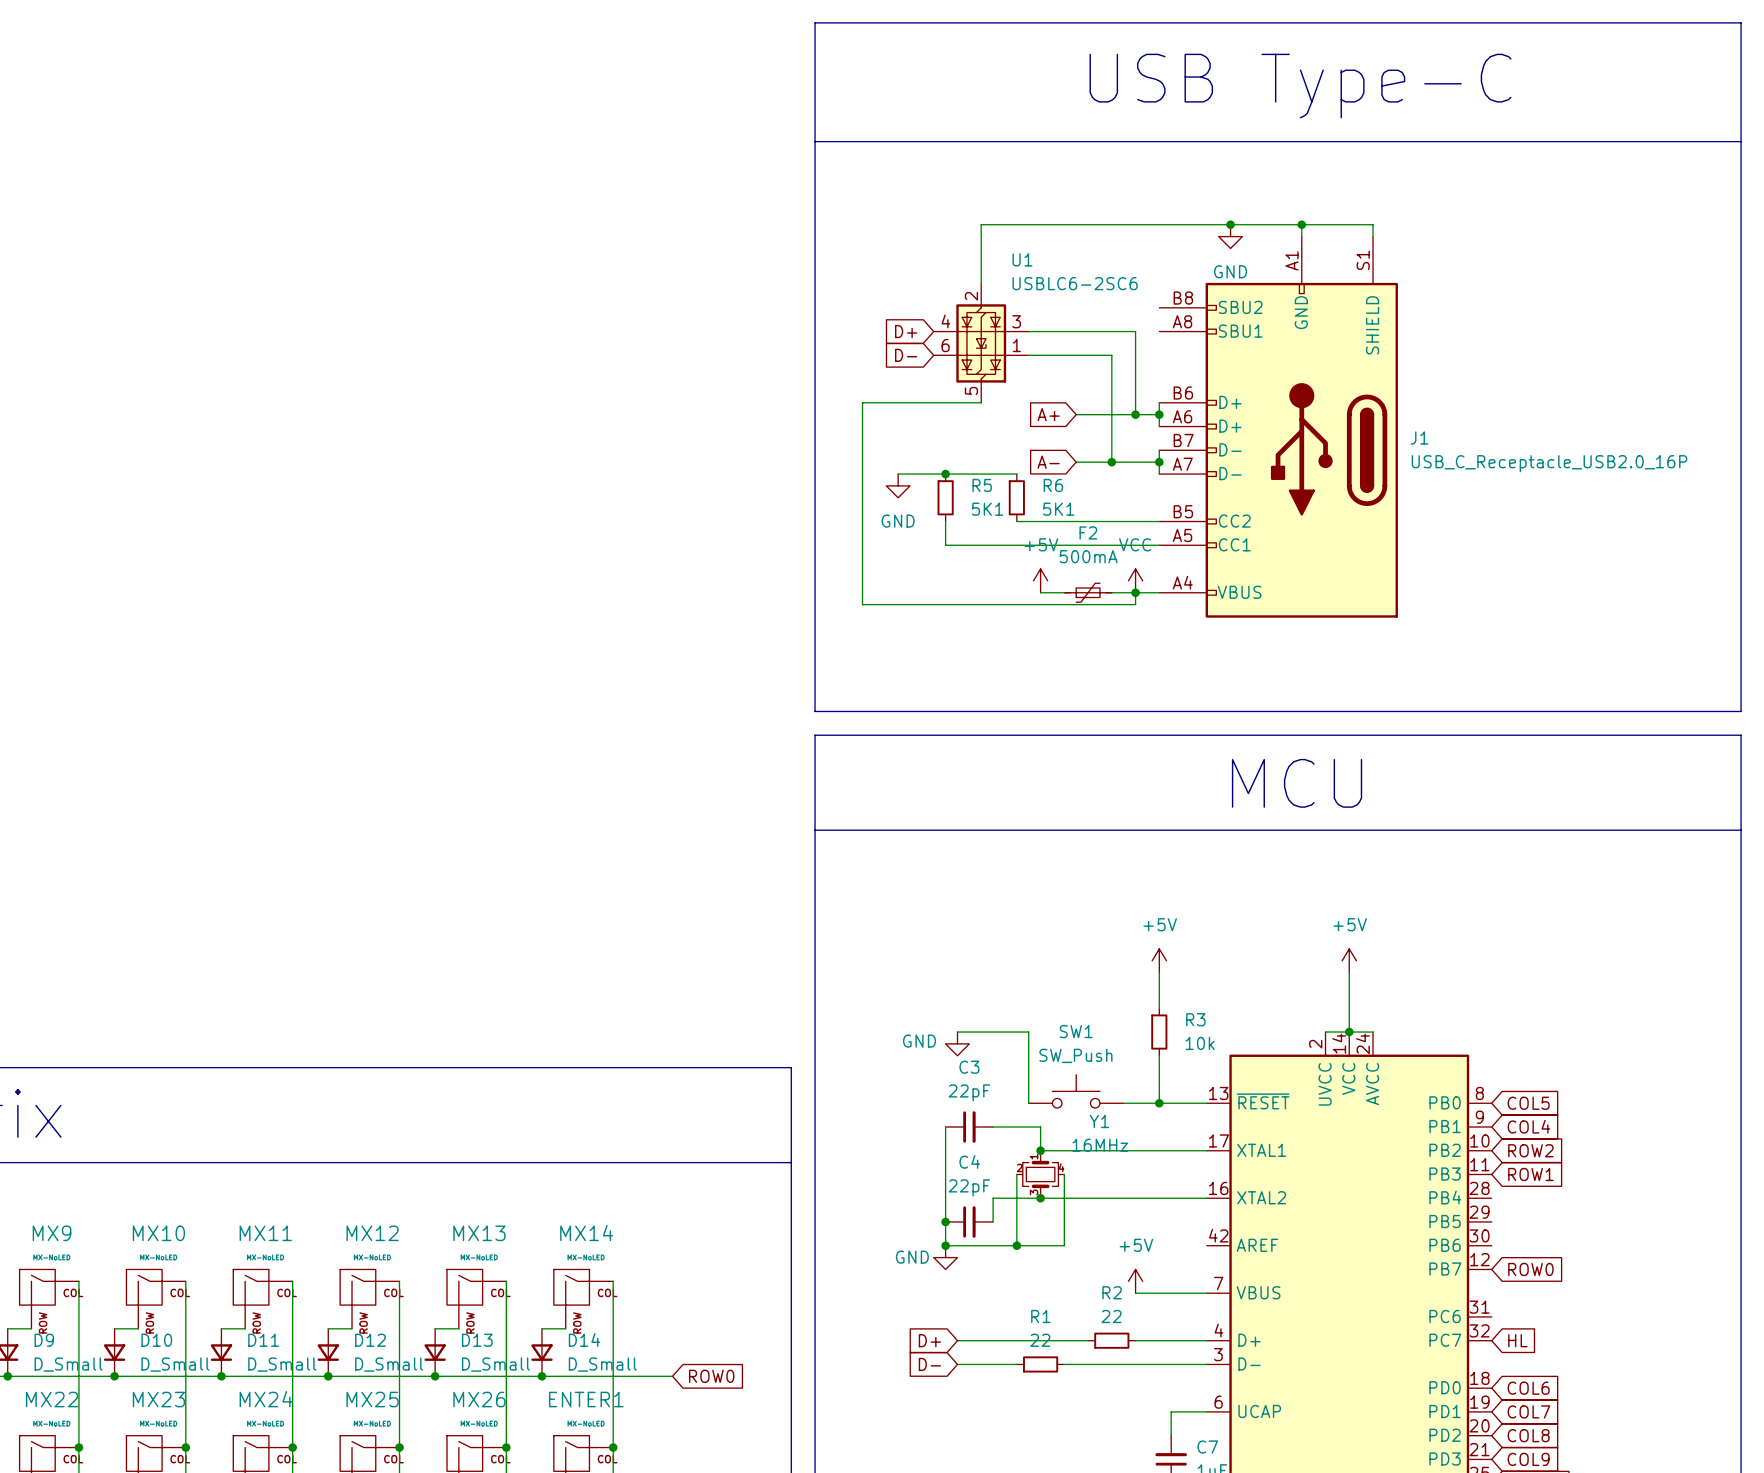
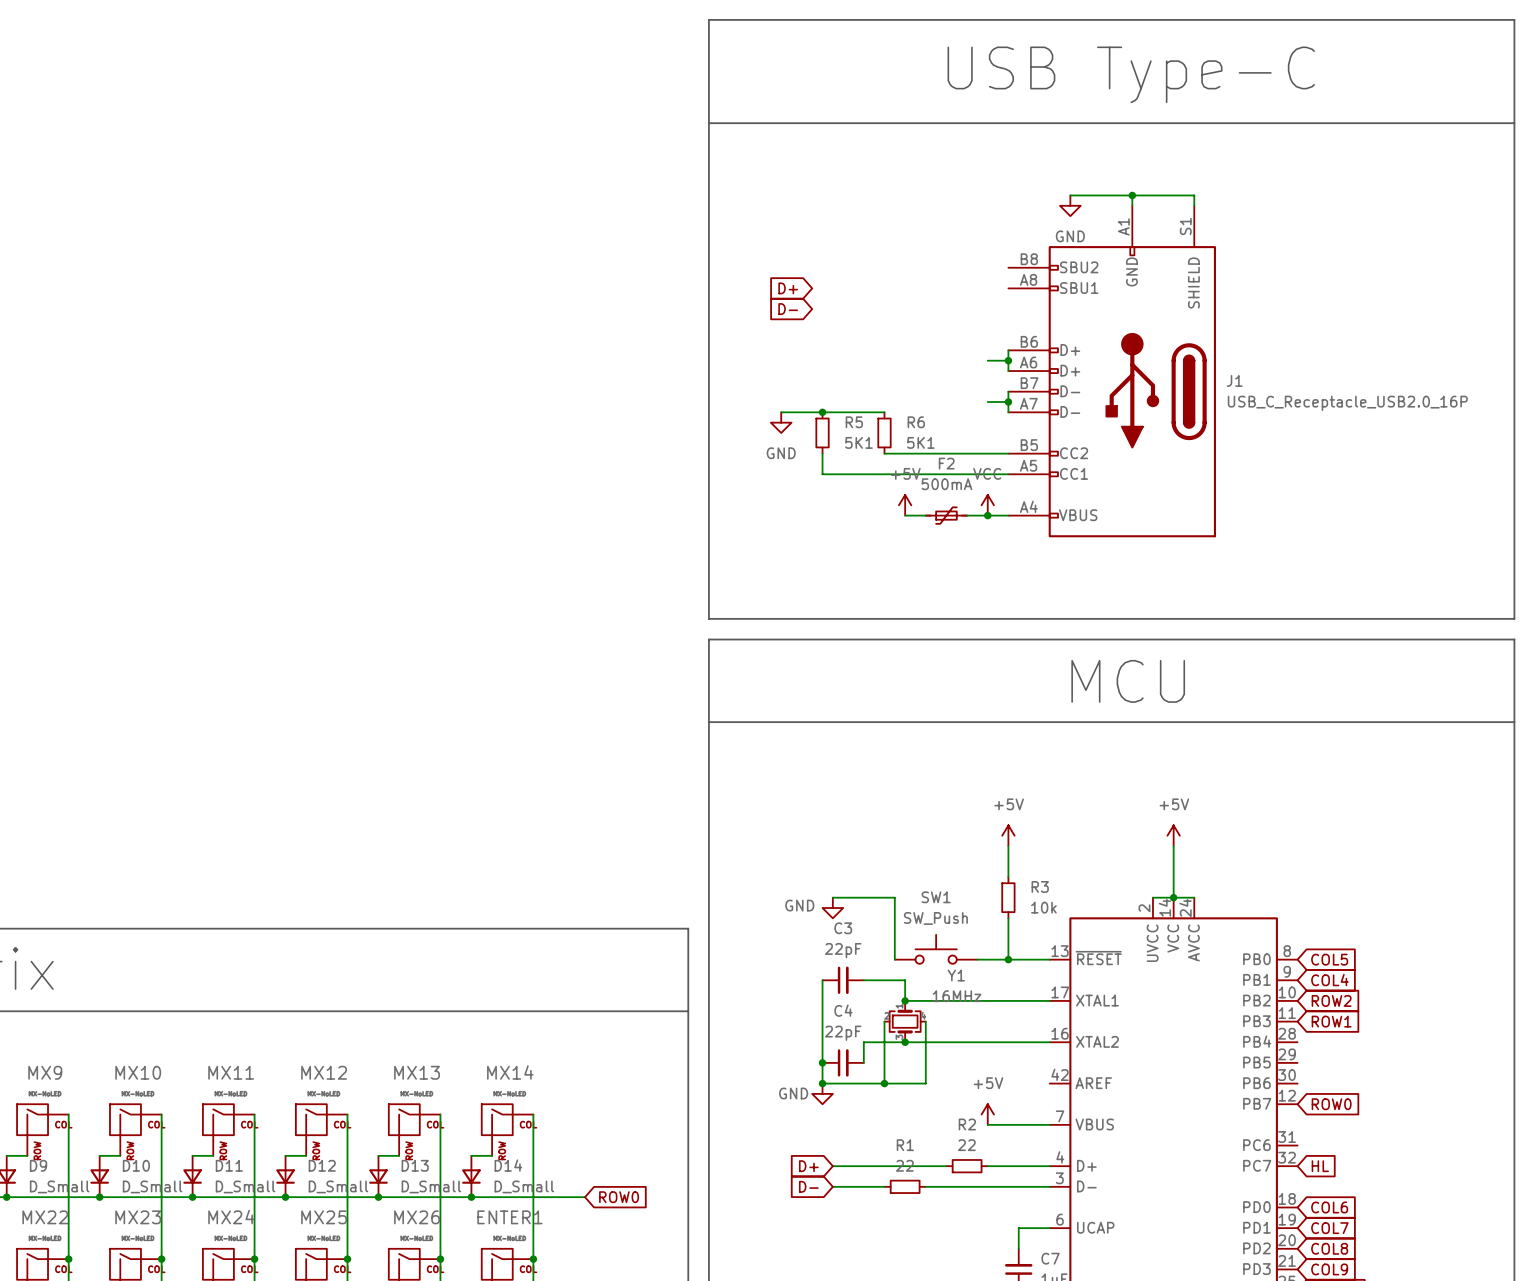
wire: (1230, 224) (981, 224) (981, 284) -> none
junction: (1230, 224) -> none
wire: (1028, 331) (1135, 331) (1135, 414) (1076, 414) -> none
U1: USBLC6-2SC6 (981, 343) -> none
wire: (1028, 355) (1111, 355) (1111, 462) -> none
wire: (981, 402) (862, 402) (862, 604) (1135, 604) (1135, 592) -> none
global label: A+ (1048, 414) -> none
junction: (1135, 414) -> none
global label: A- (1048, 462) -> none
wire: (1076, 462) (1135, 462) -> none
junction: (1111, 462) -> none

